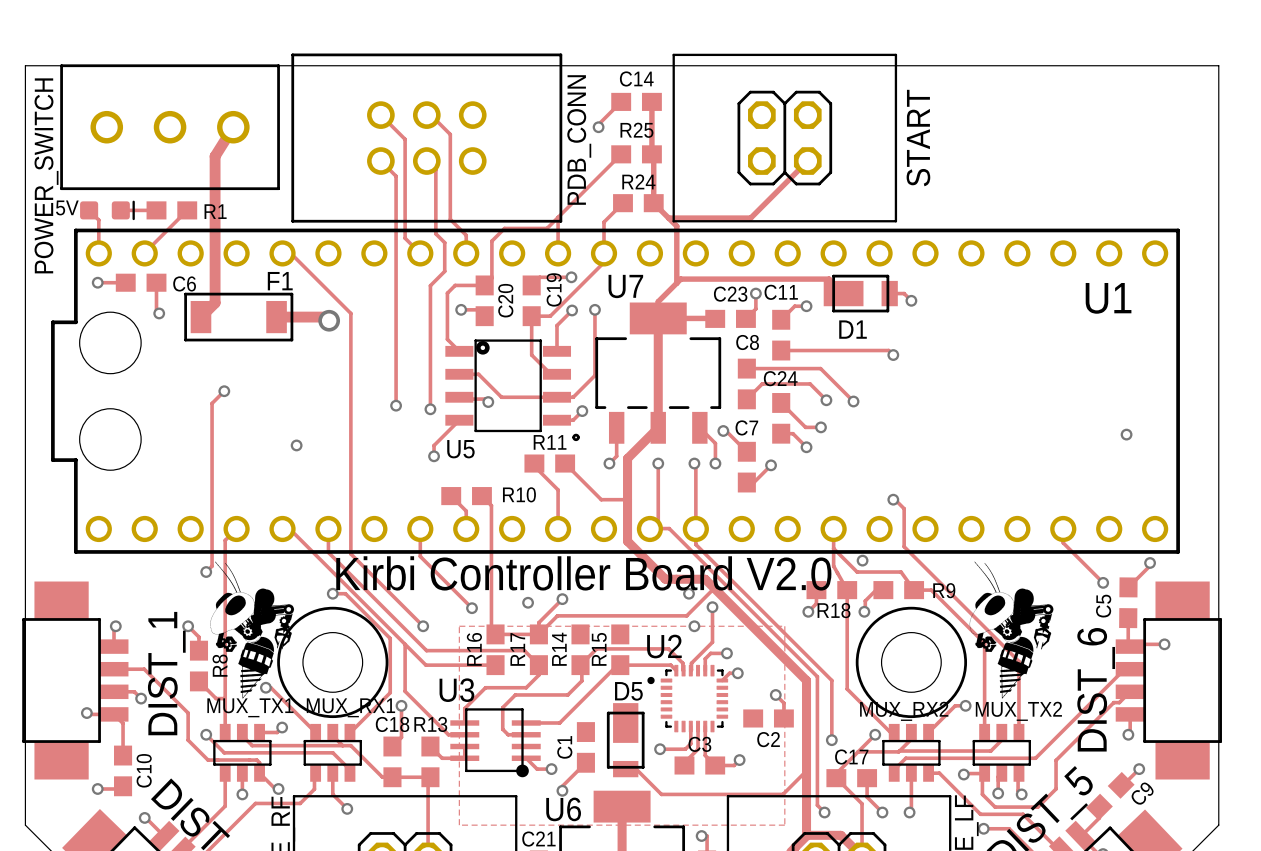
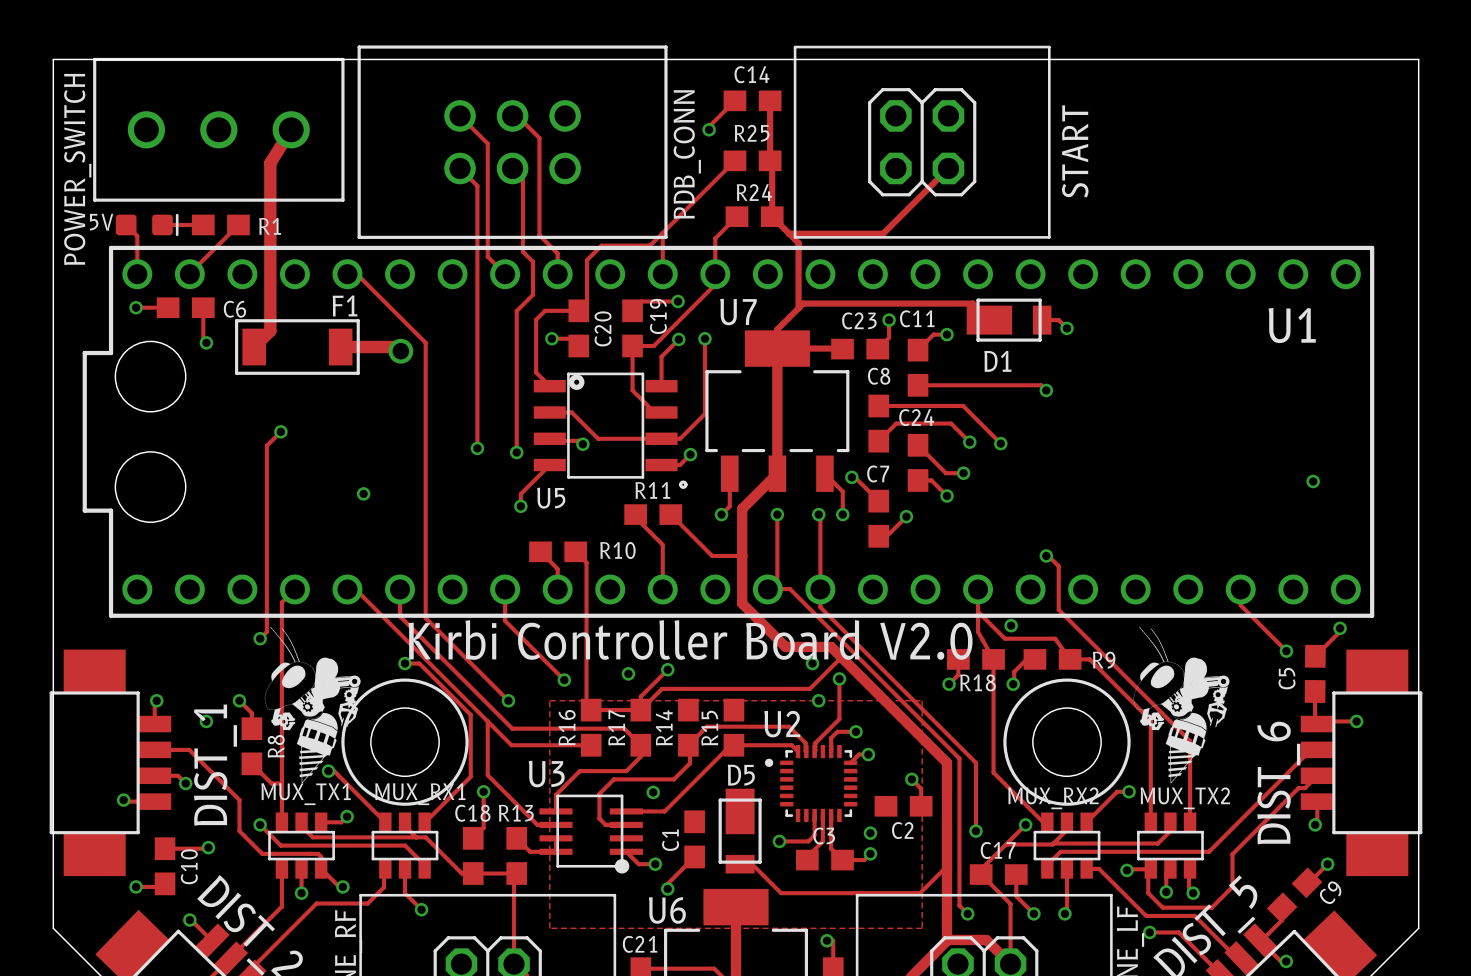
via: none -> (206, 721)
via: none -> (653, 792)
track: (114, 714) (123, 723) (123, 755) -> (208, 847) (165, 848)
via: none -> (870, 833)
via: none -> (208, 847)

